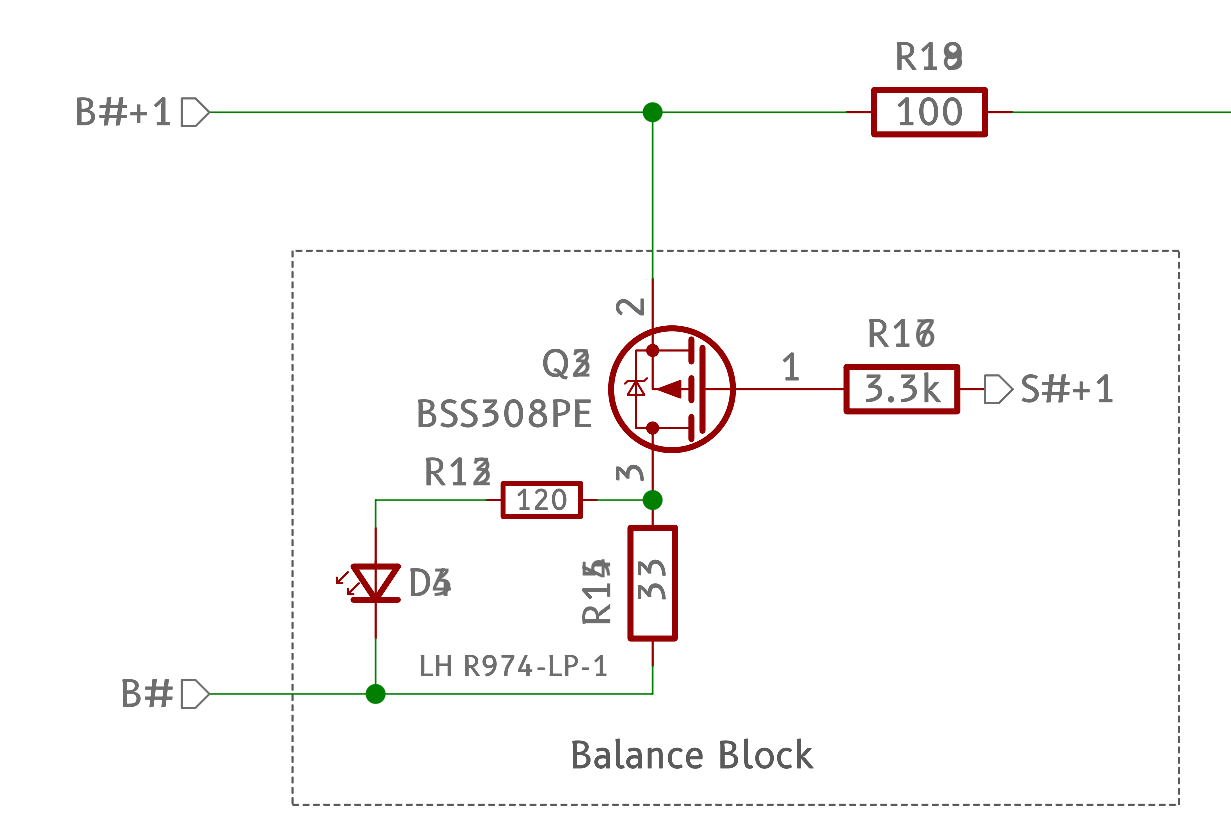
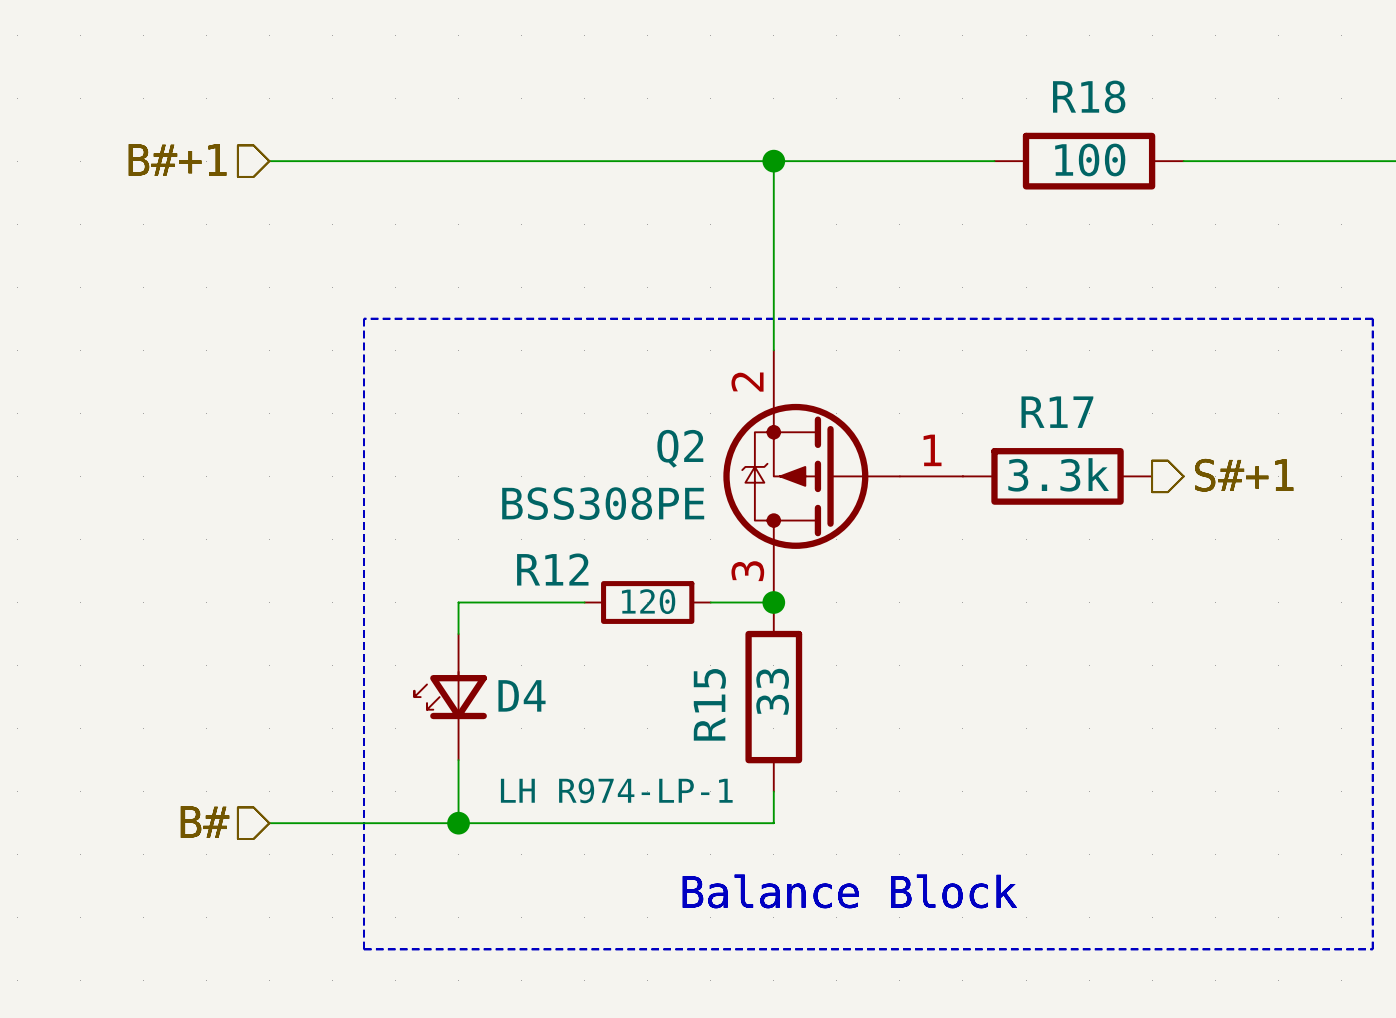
part: 100 (929, 112) -> none
part: BSS308PE (713, 389) -> none
part: 3.3k (901, 389) -> none
part: 120 (541, 500) -> none
part: LH R974-LP-1 (368, 583) -> none
part: 33 (652, 583) -> none

